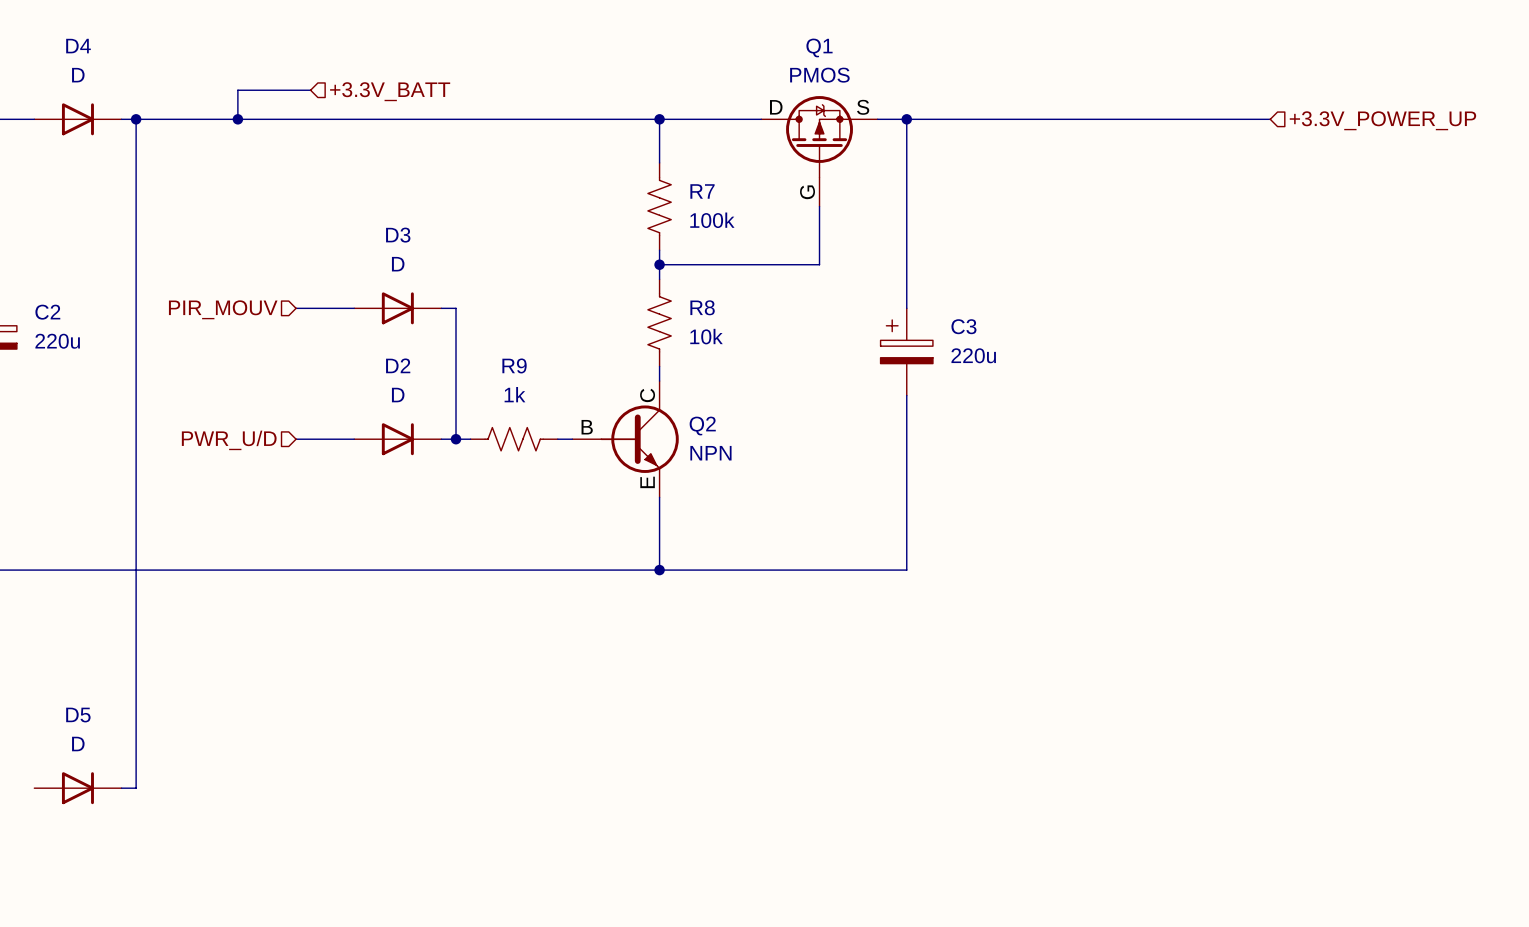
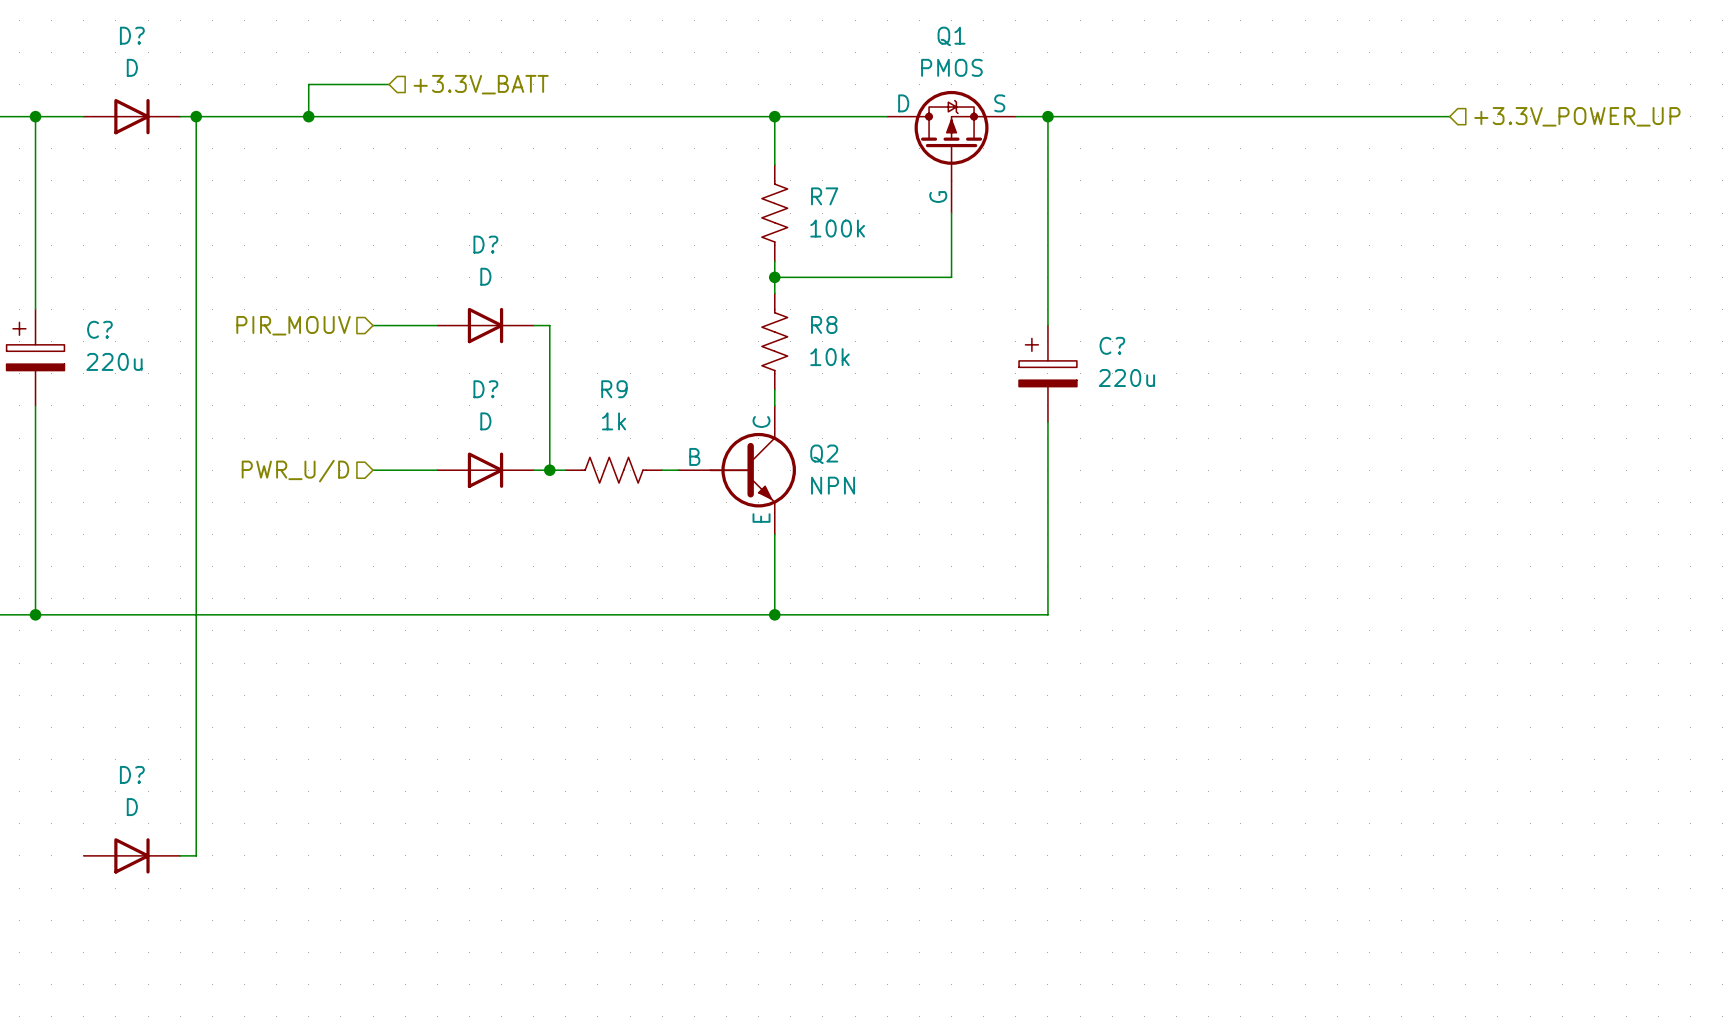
D4 name: D4 (78, 46) -> D? (132, 35)
D3 name: D3 (398, 235) -> D? (485, 244)
C2 name: C2 (47, 312) -> C? (99, 329)
C3 name: C3 (963, 326) -> C? (1112, 345)
D2 name: D2 (398, 365) -> D? (485, 389)
D5 name: D5 (78, 715) -> D? (132, 774)

